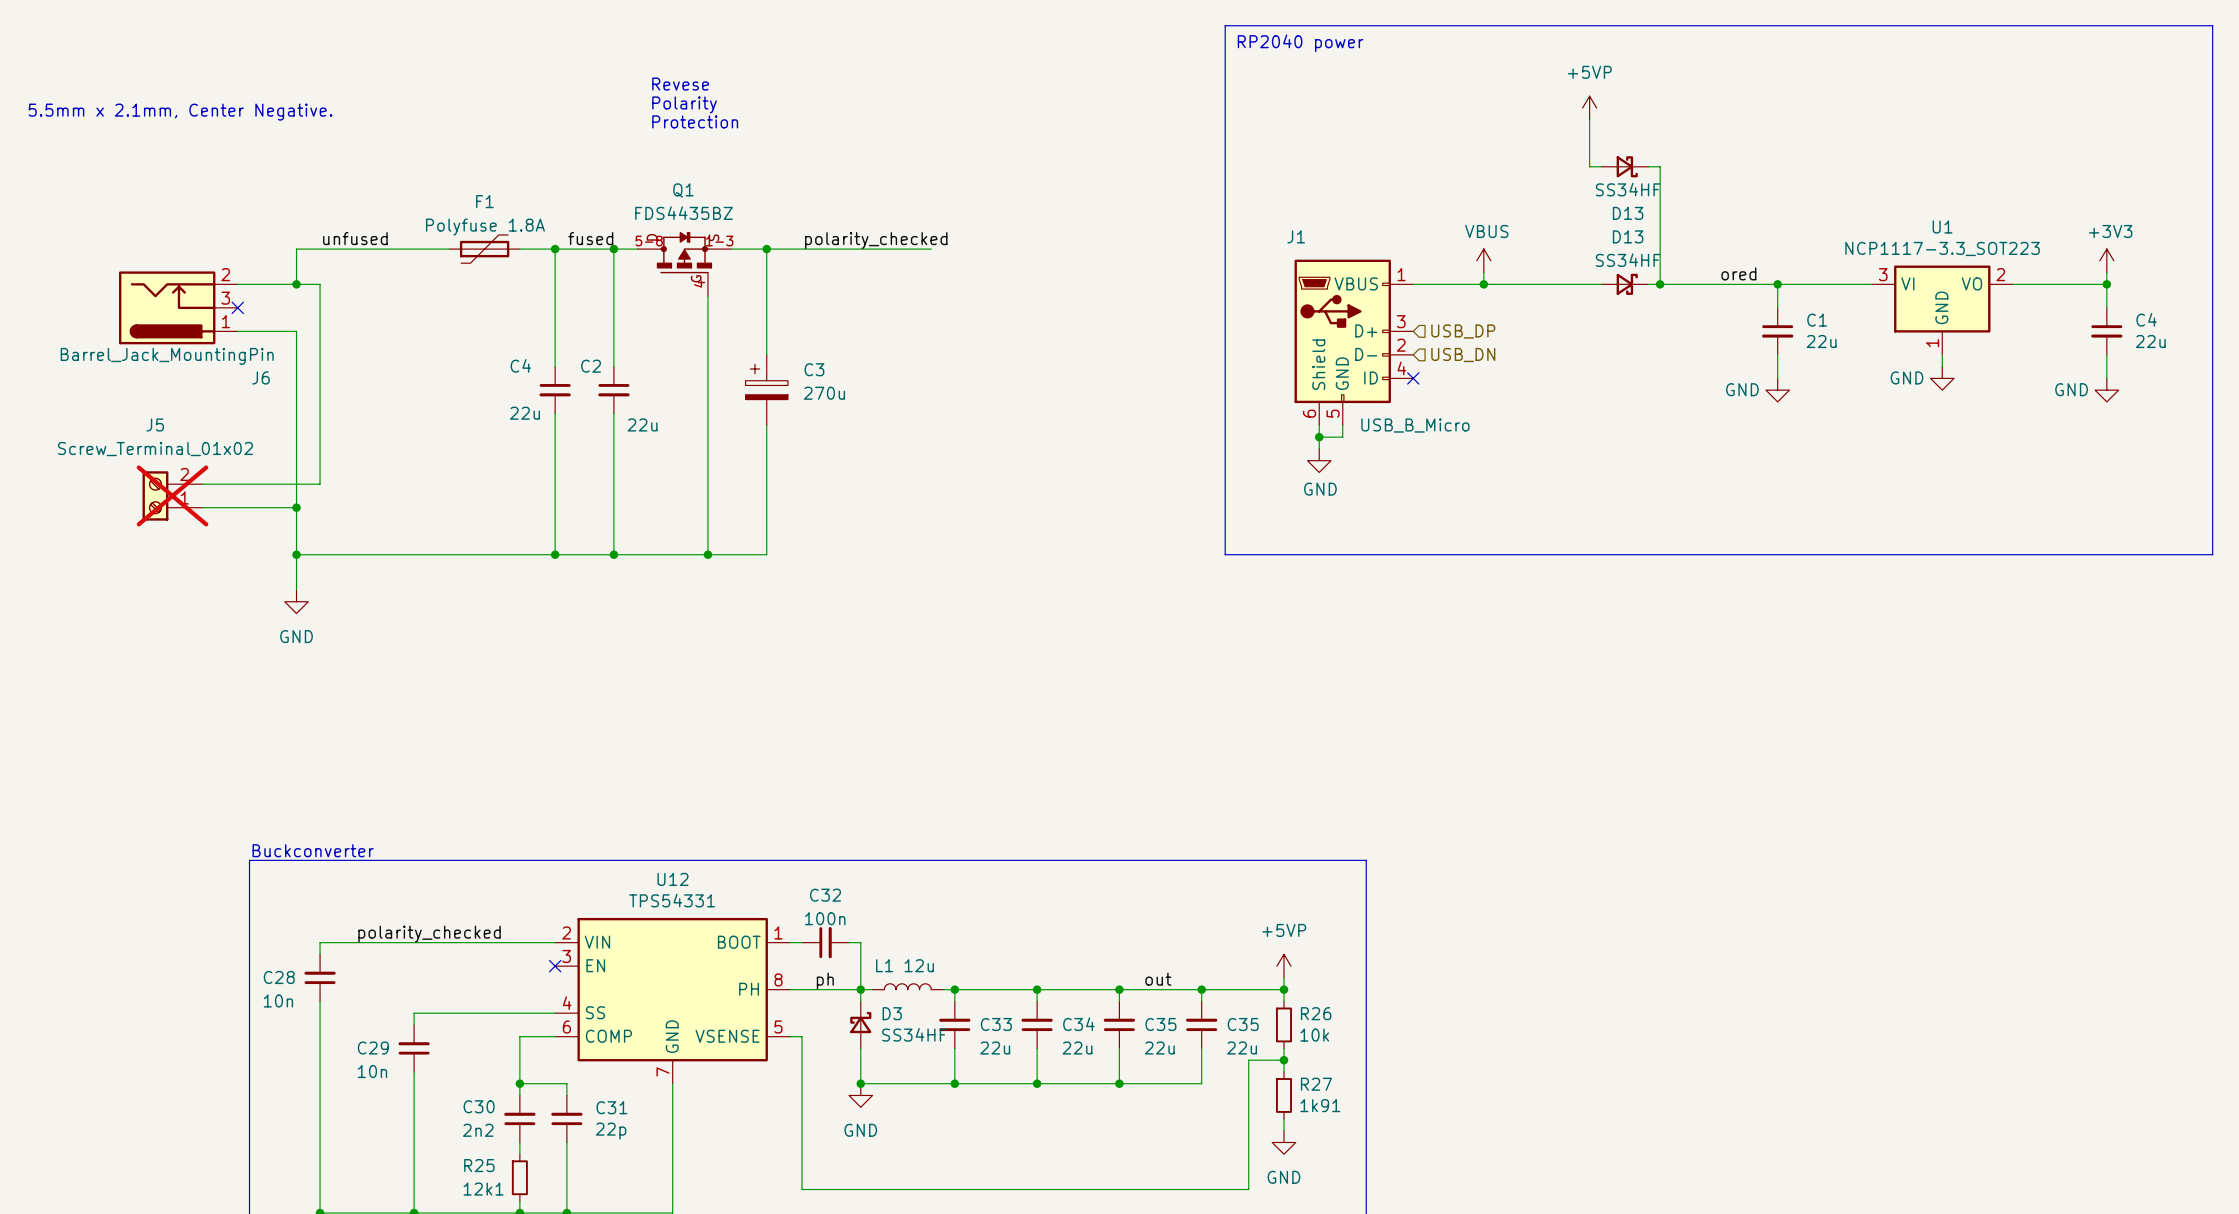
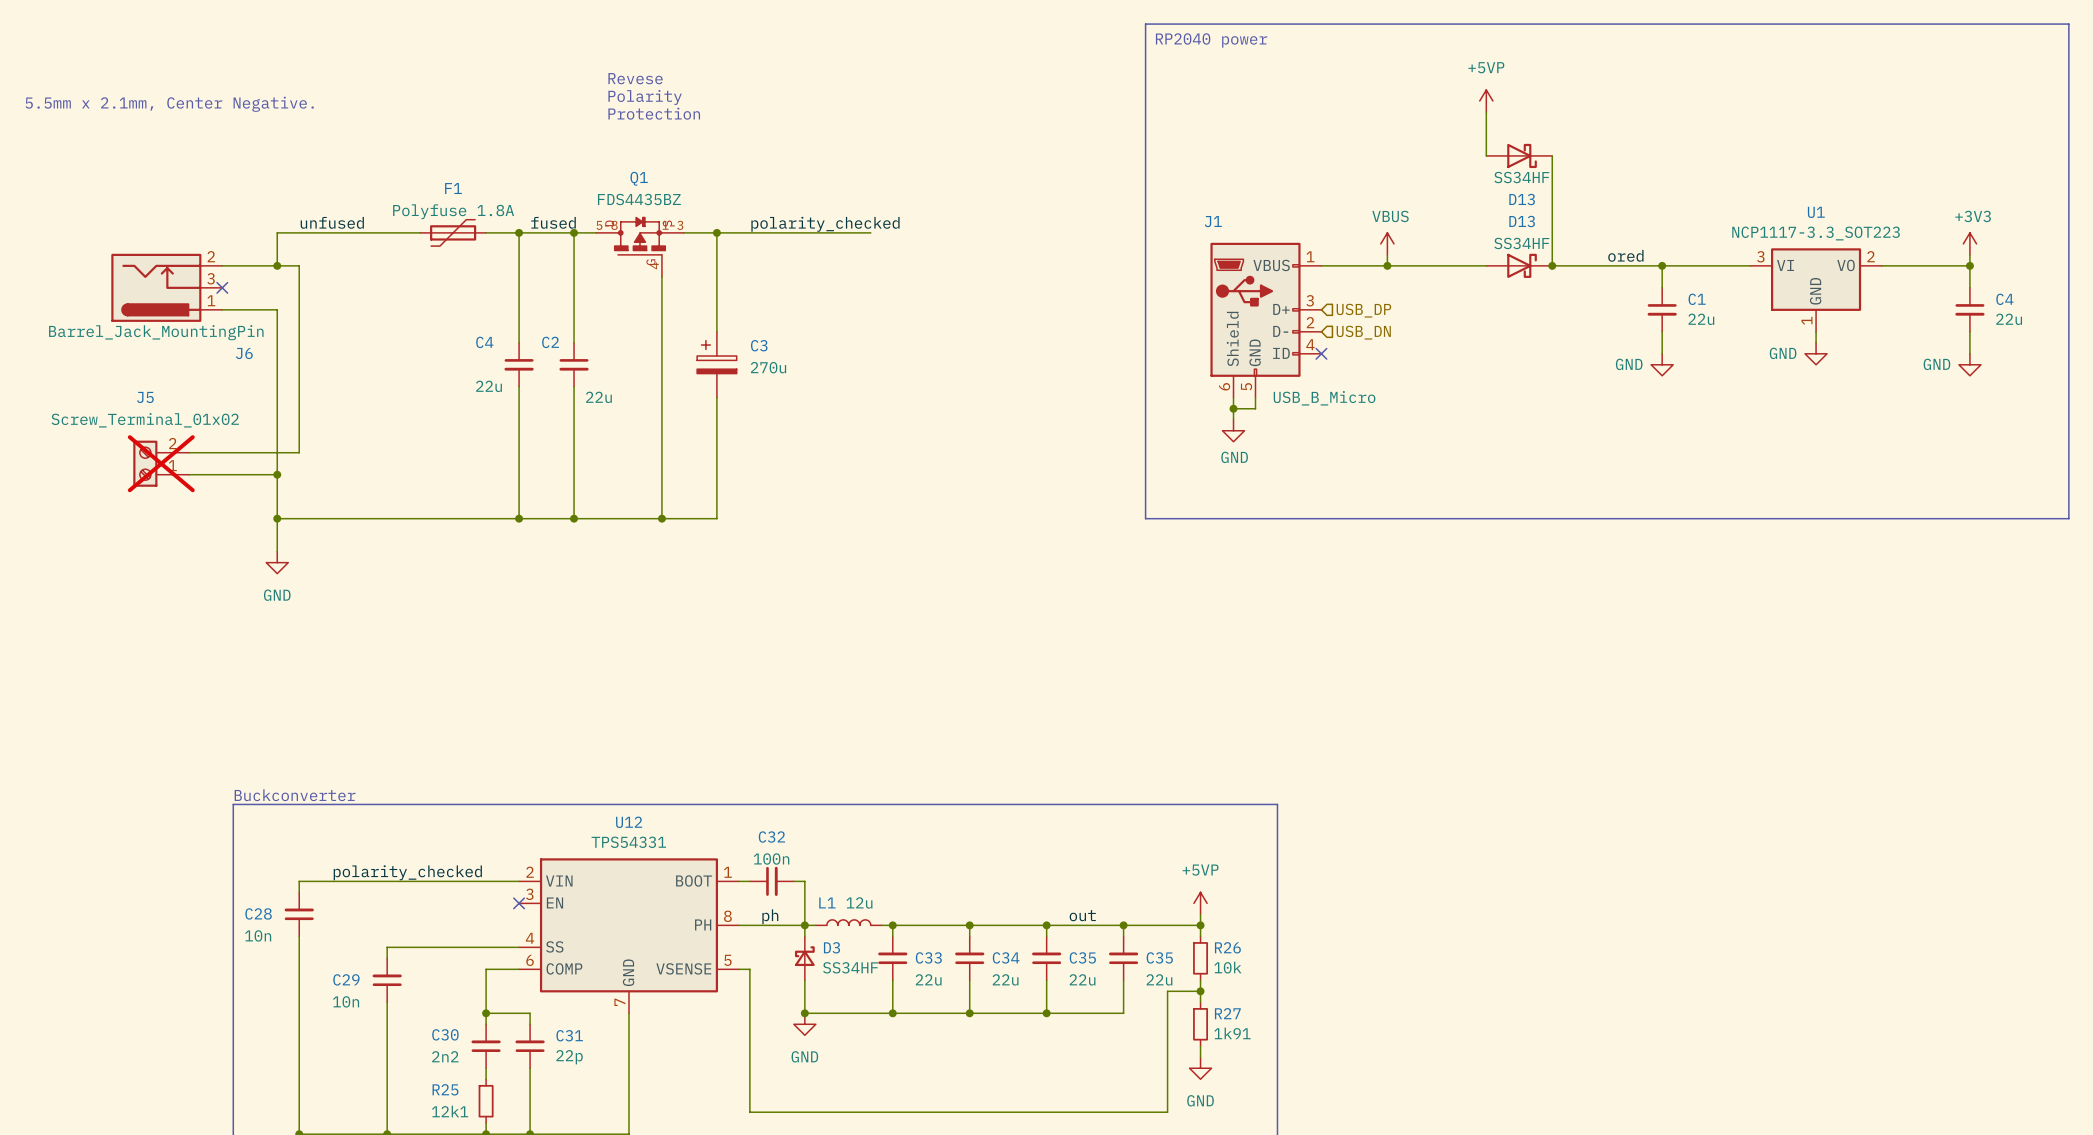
D13 symbol: [1601, 156, 1649, 178] -> [1486, 143, 1553, 169]
D13 symbol: [1601, 273, 1649, 295] -> [1486, 253, 1553, 278]

